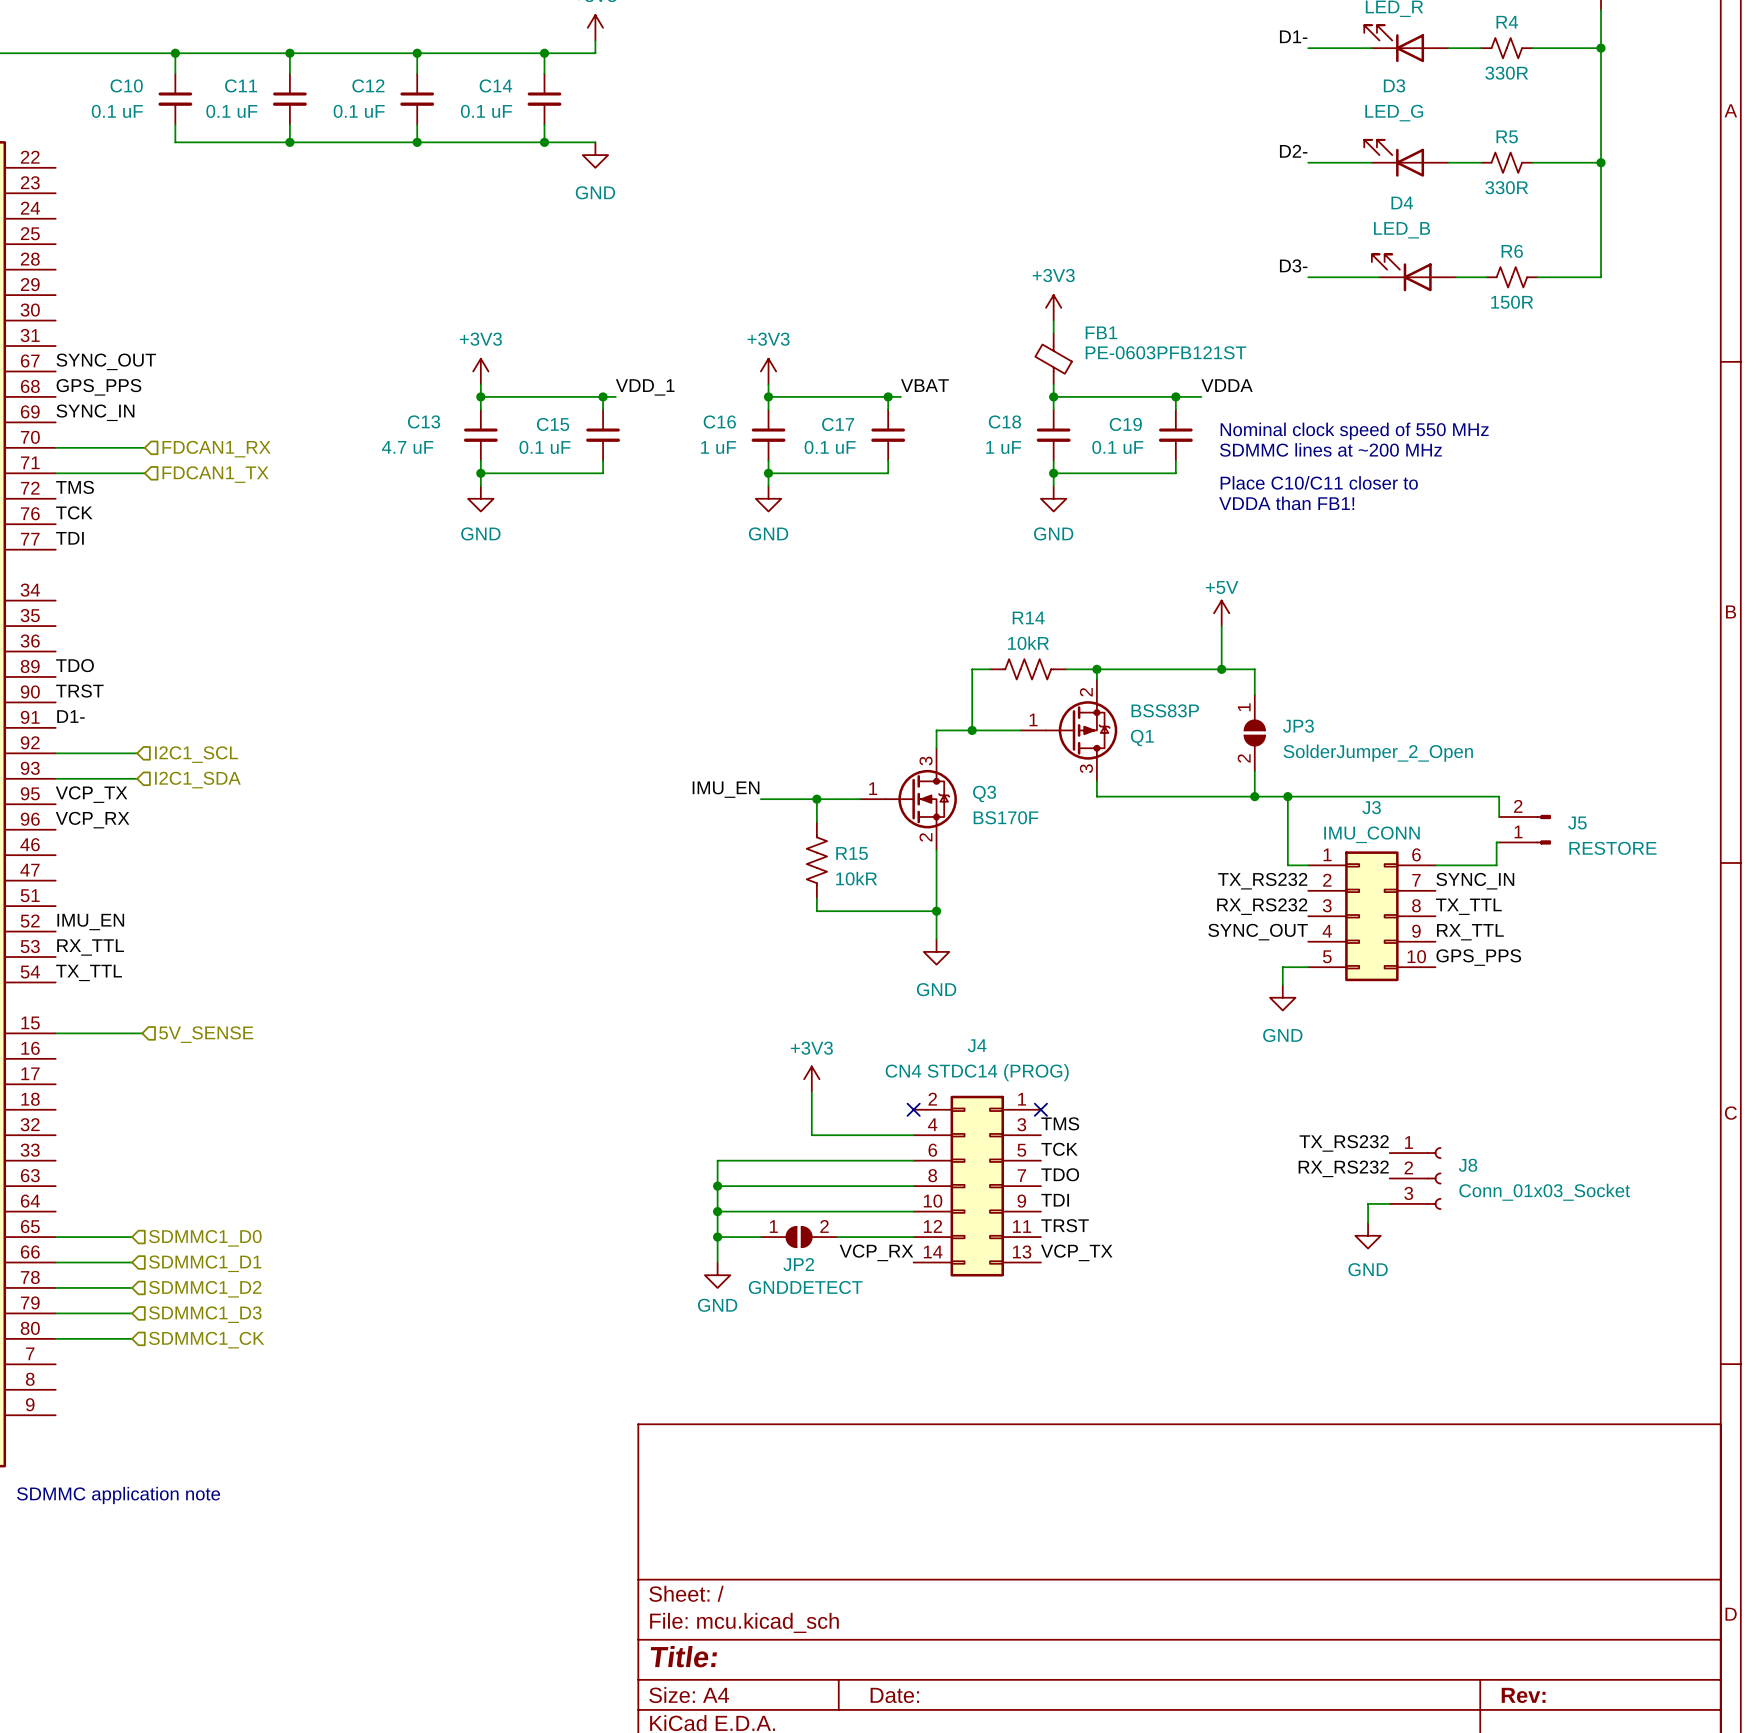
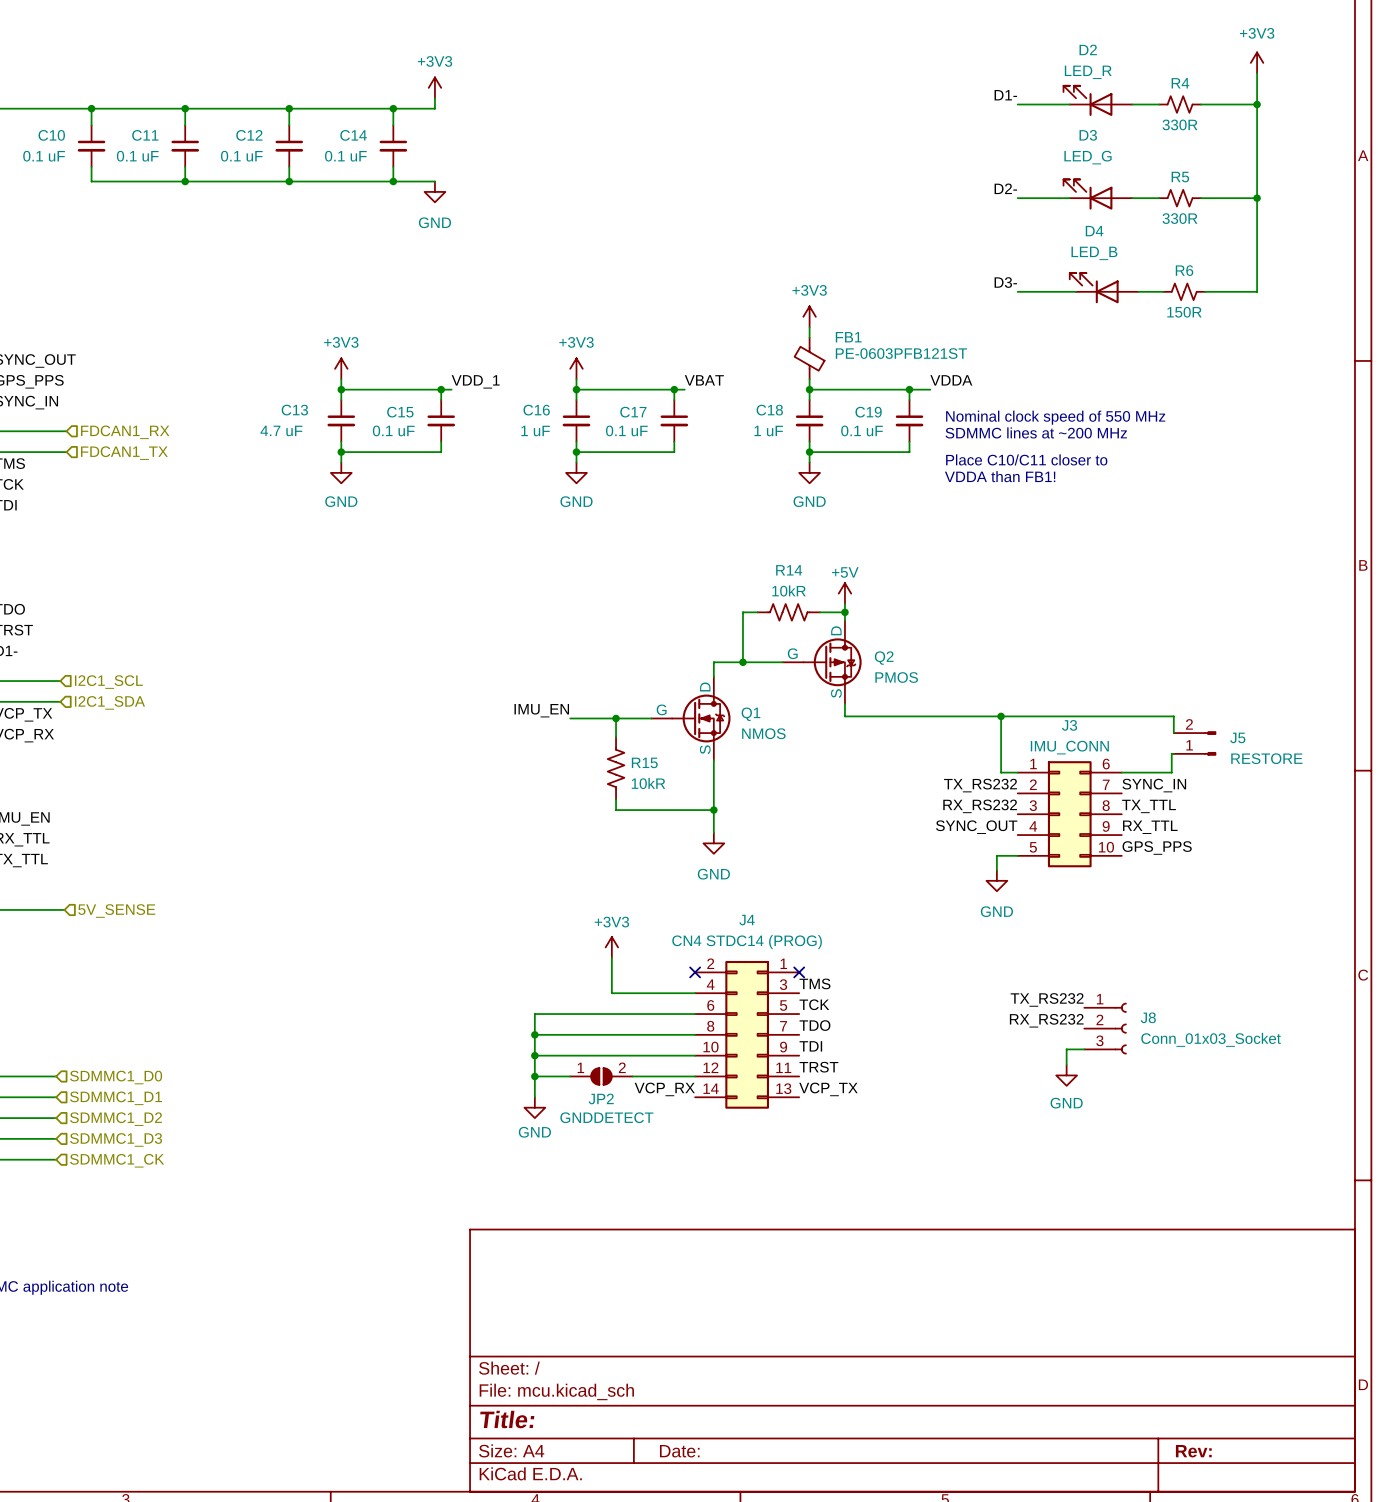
power symbol position: +5V (1221, 613) -> +5V (844, 593)
wire: (1221, 626) (1221, 669) -> none
wire: (1096, 669) (1254, 669) (1254, 694) -> (844, 612) (844, 604)
junction: (1221, 669) -> none
Q1 symbol: [1020, 679, 1118, 782] -> [651, 676, 731, 761]
Q1 value: BSS83P (1165, 710) -> NMOS (763, 733)
Q2: none -> PMOS (822, 662)
JP3: SolderJumper_2_Open (1254, 732) -> none
wire: (1254, 771) (1254, 796) -> none
junction: (1254, 796) -> none
Q3: BS170F (908, 799) -> none

